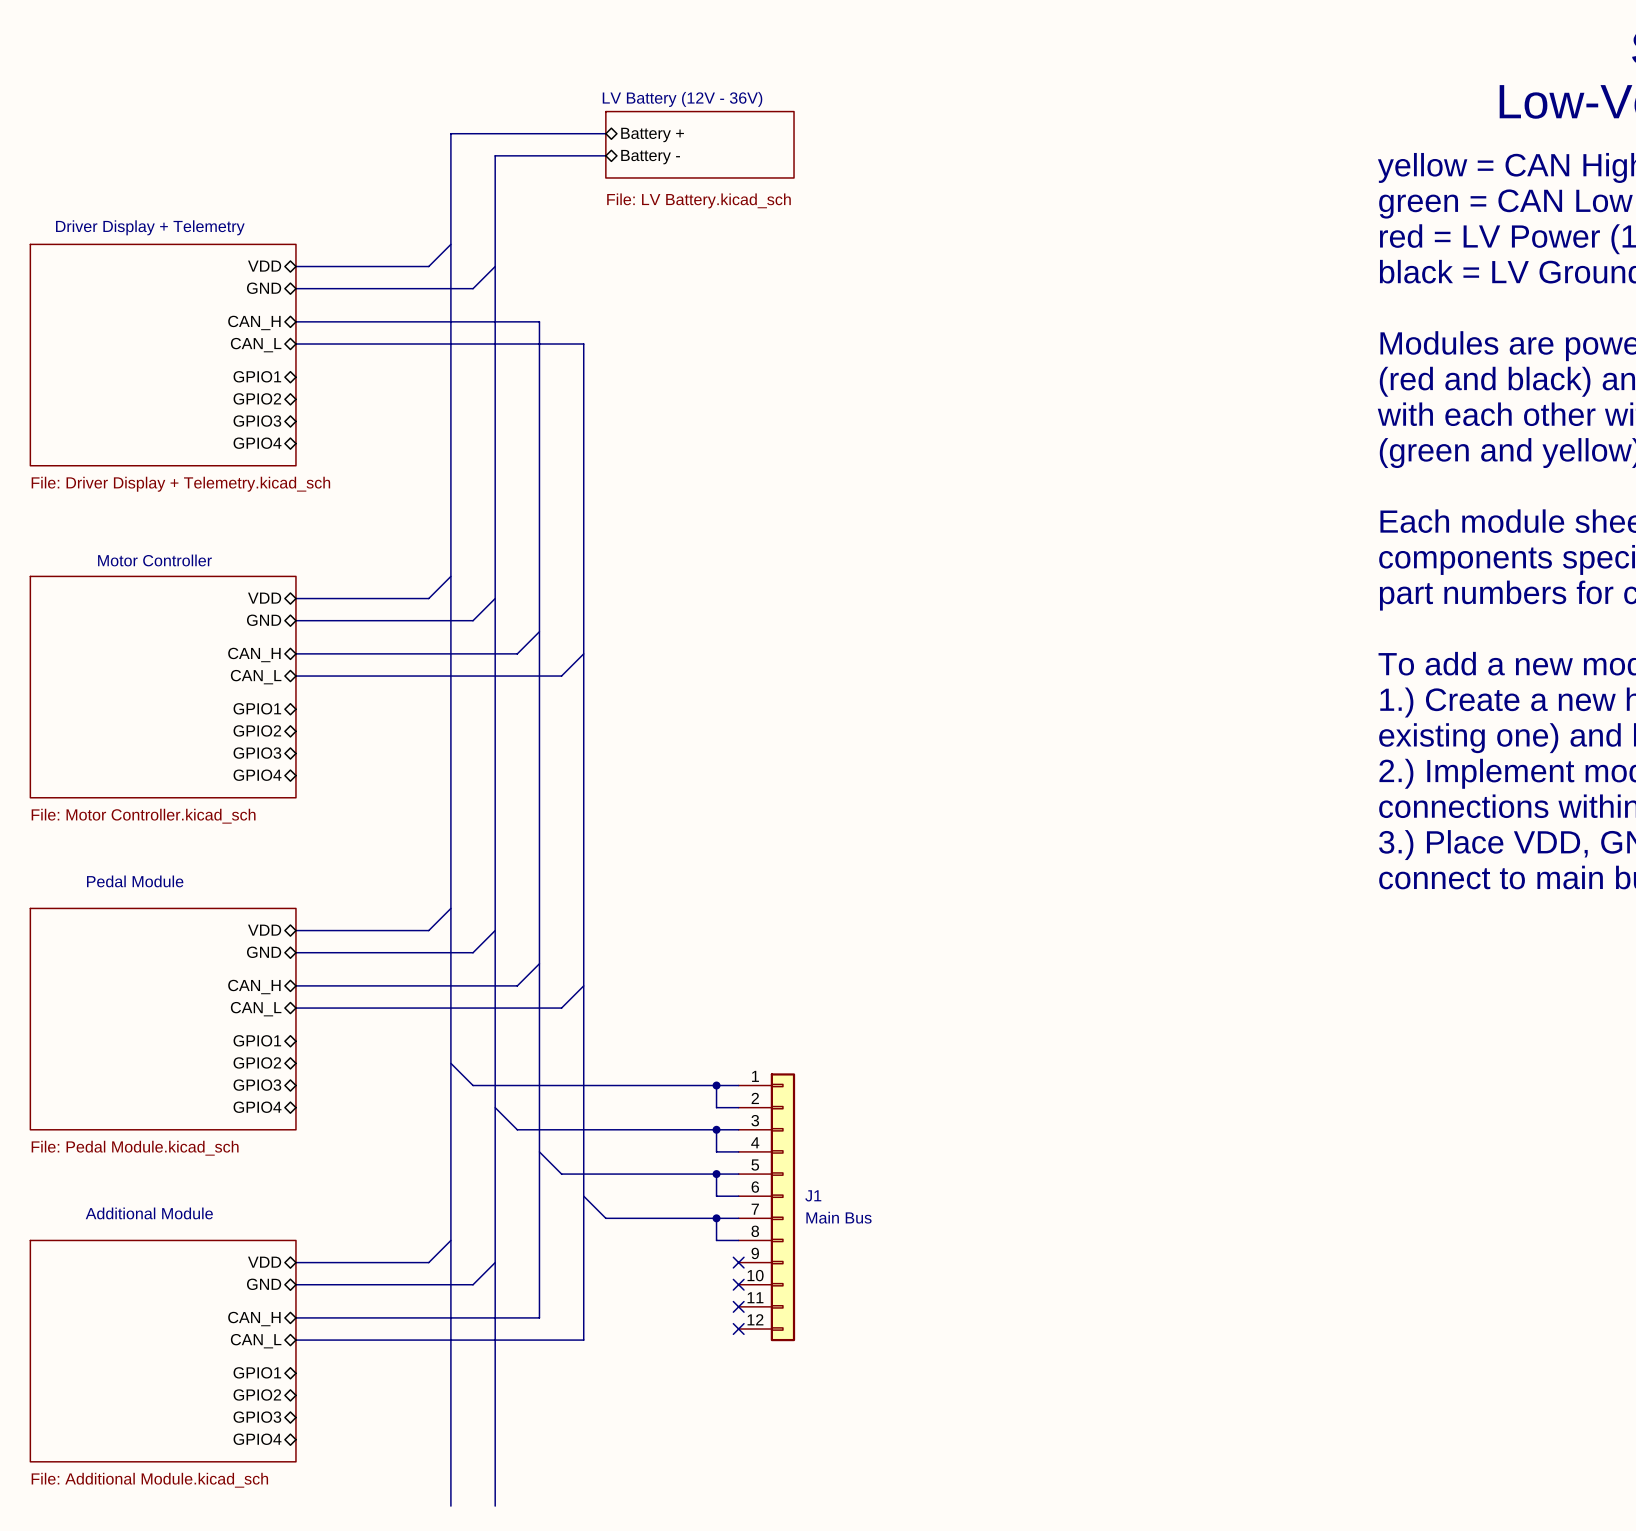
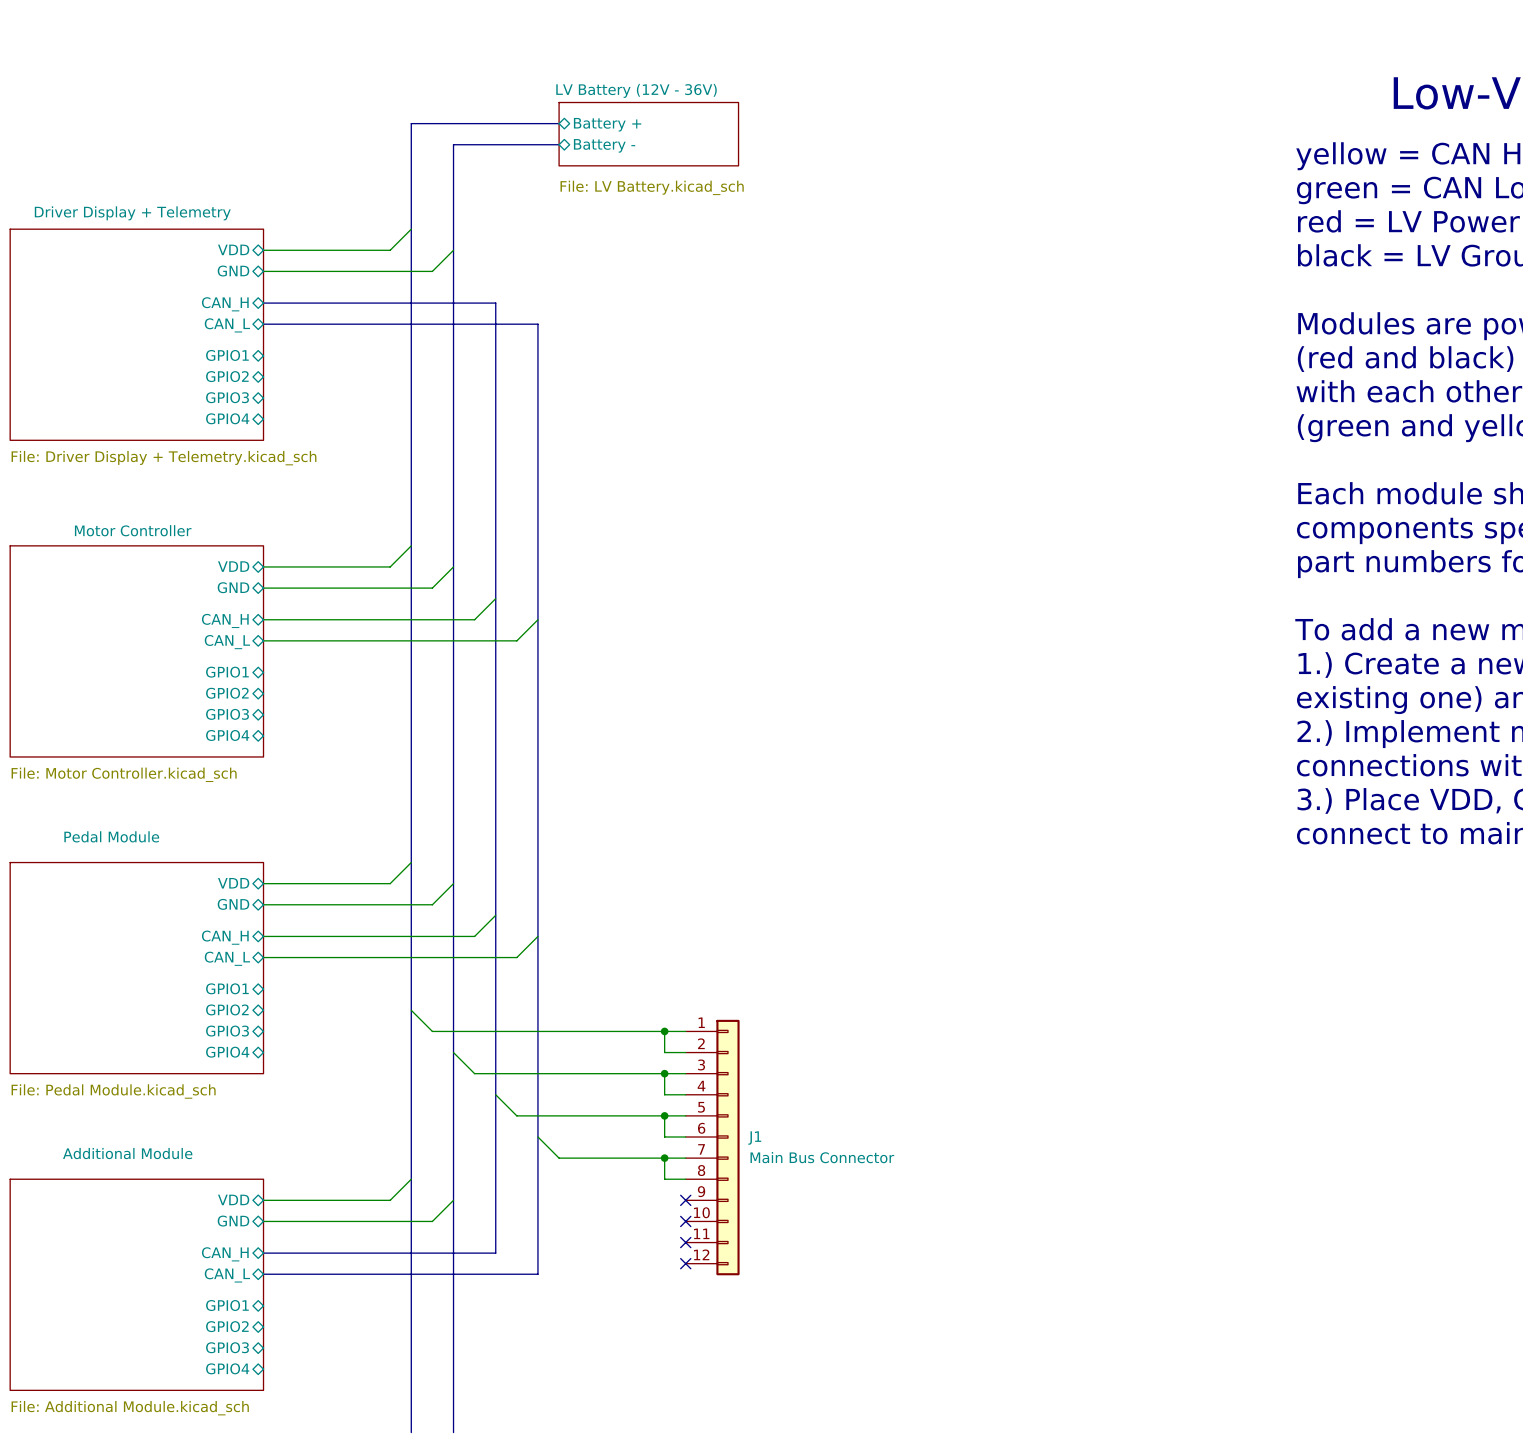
J1 value: Main Bus (838, 1217) -> Main Bus Connector (822, 1157)

